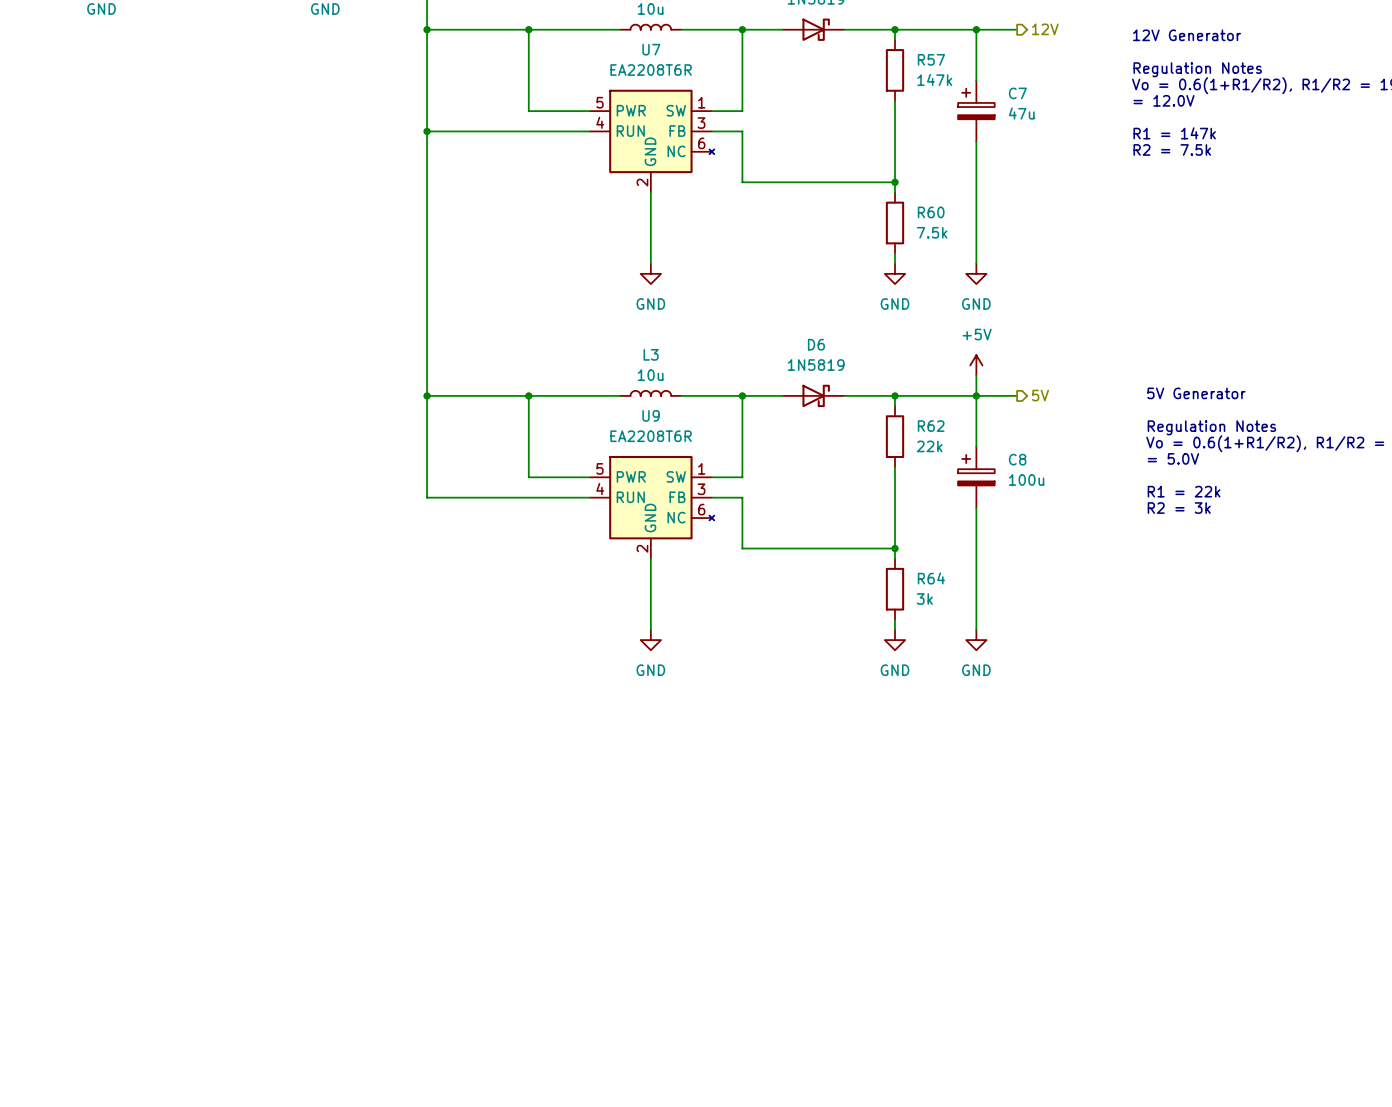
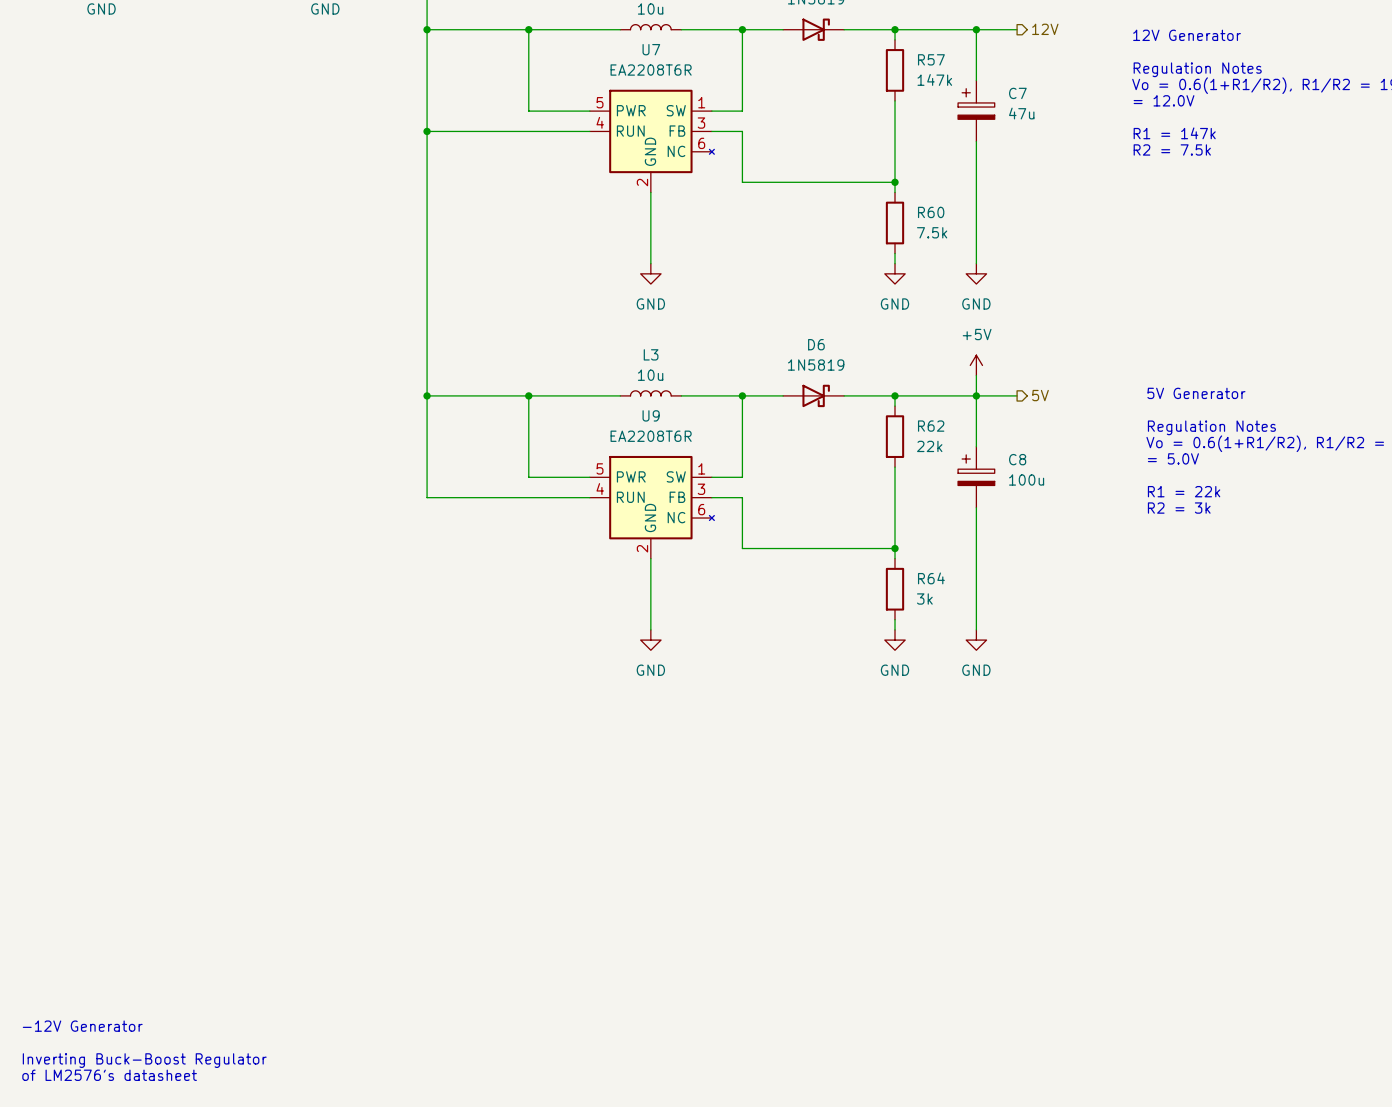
text: none -> -12V Generator (82, 1026)
text: none -> Inverting Buck-Boost Regulator (144, 1060)
text: none -> of LM2576's datasheet (109, 1075)

